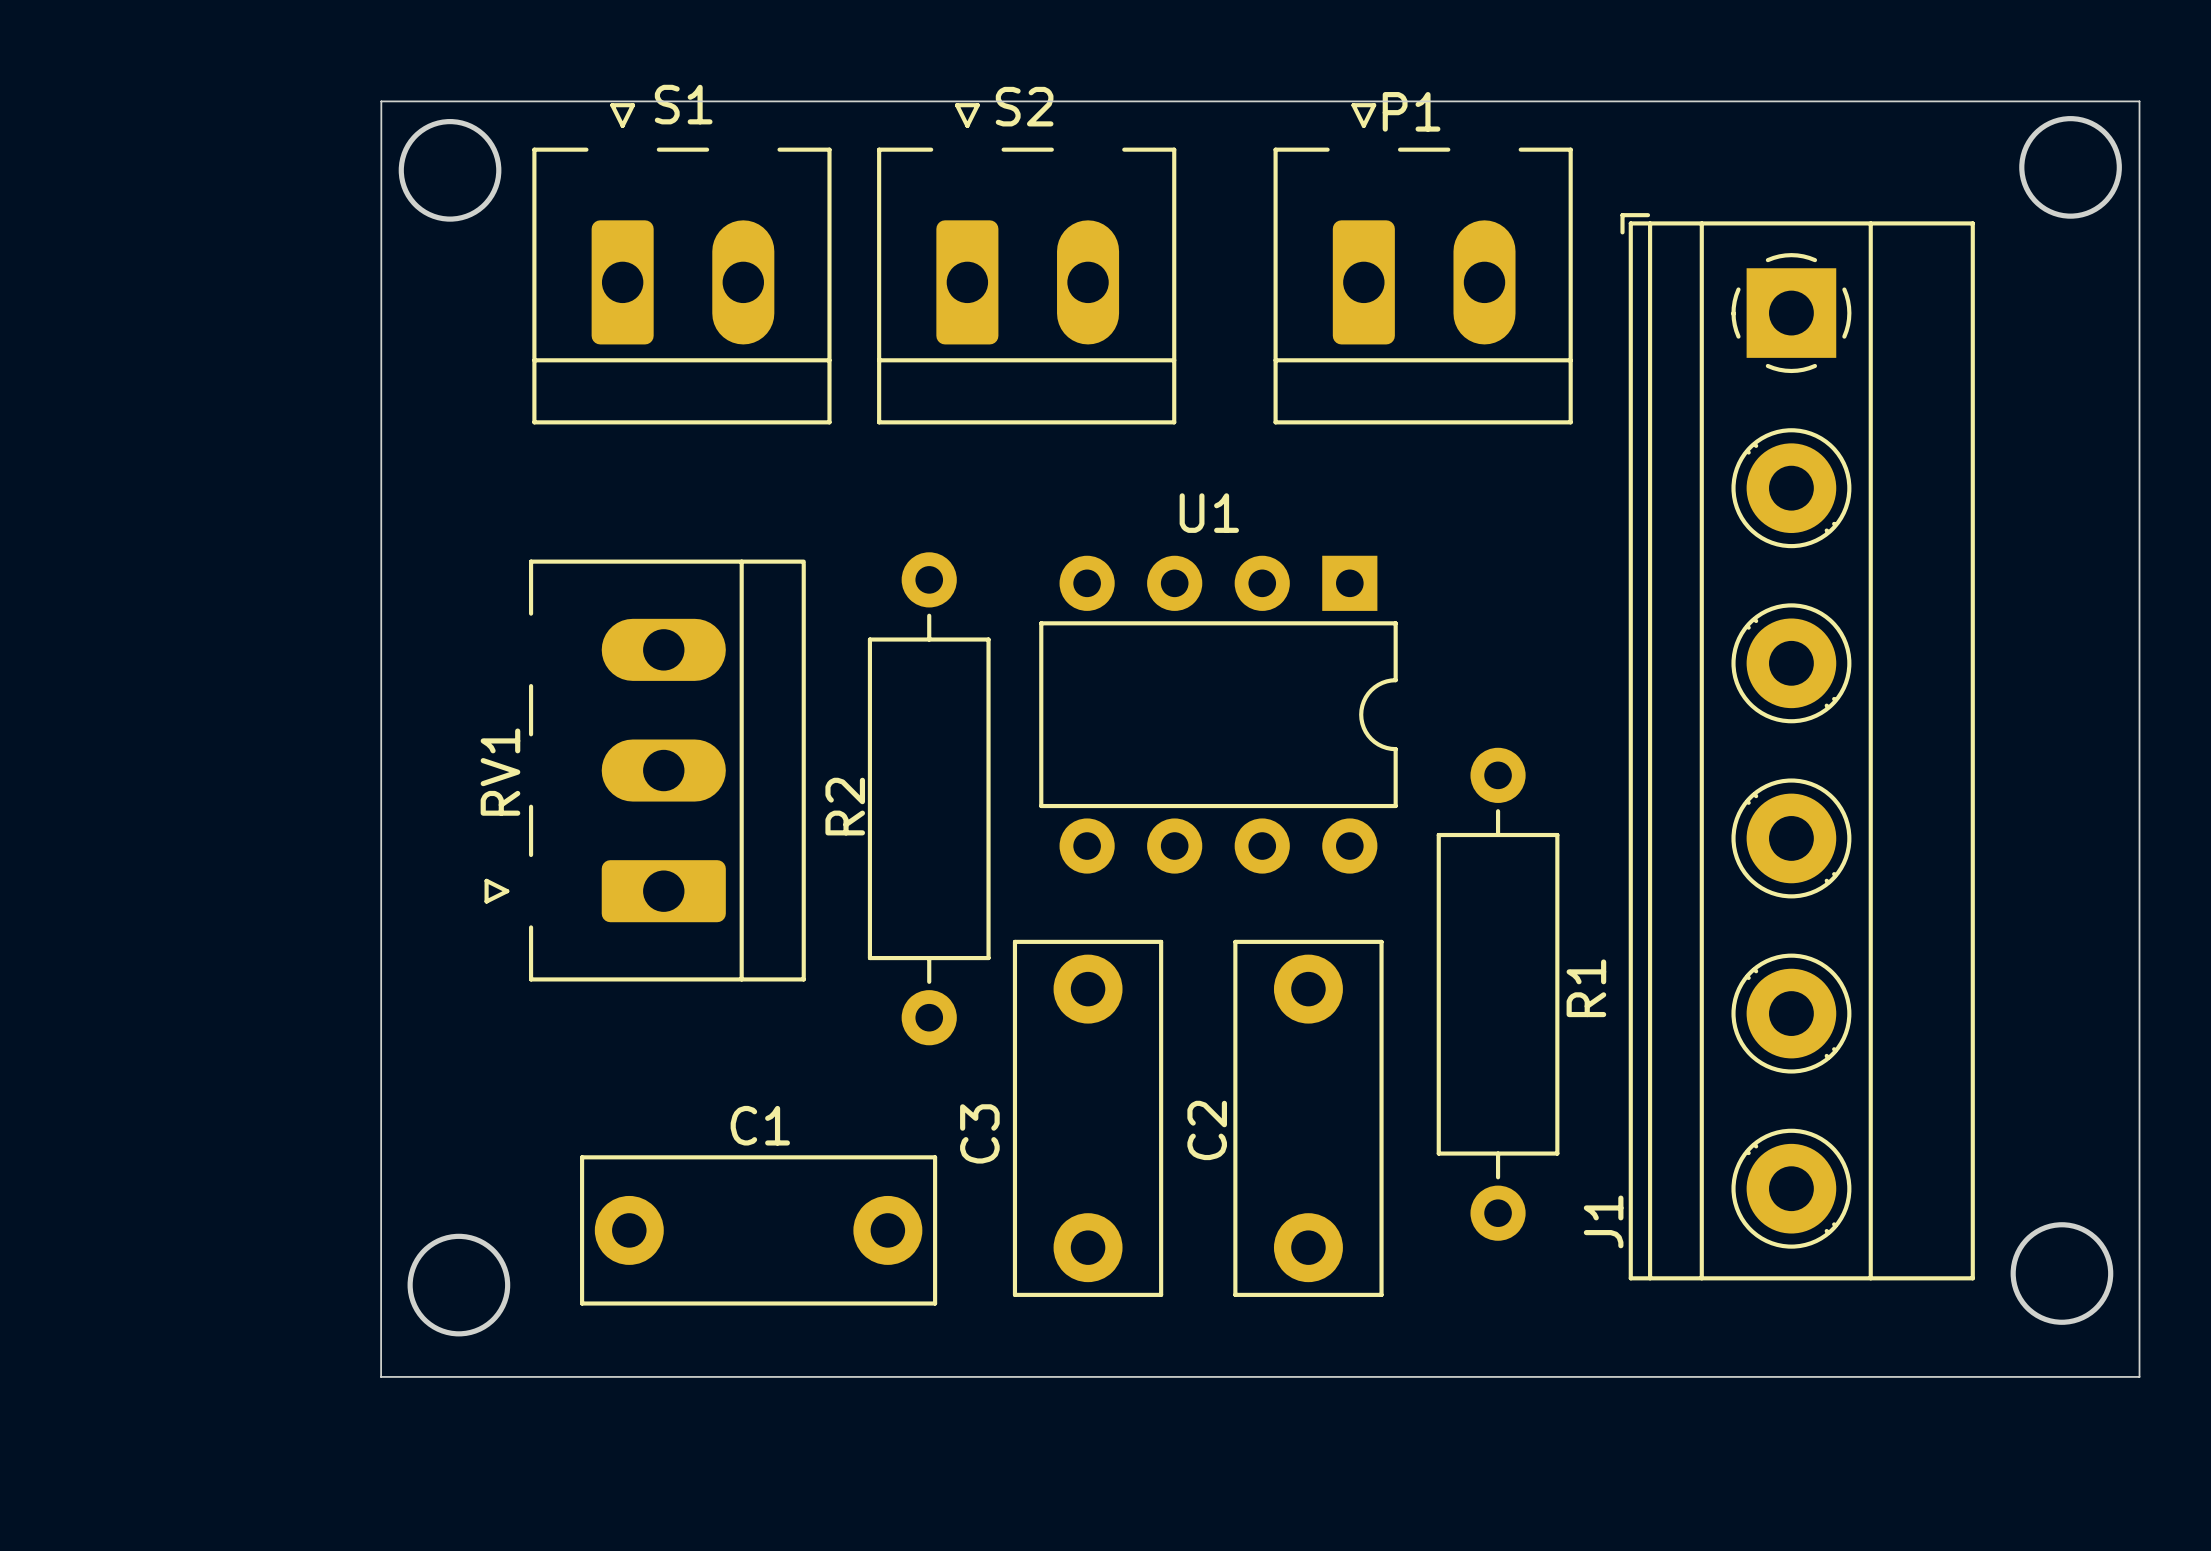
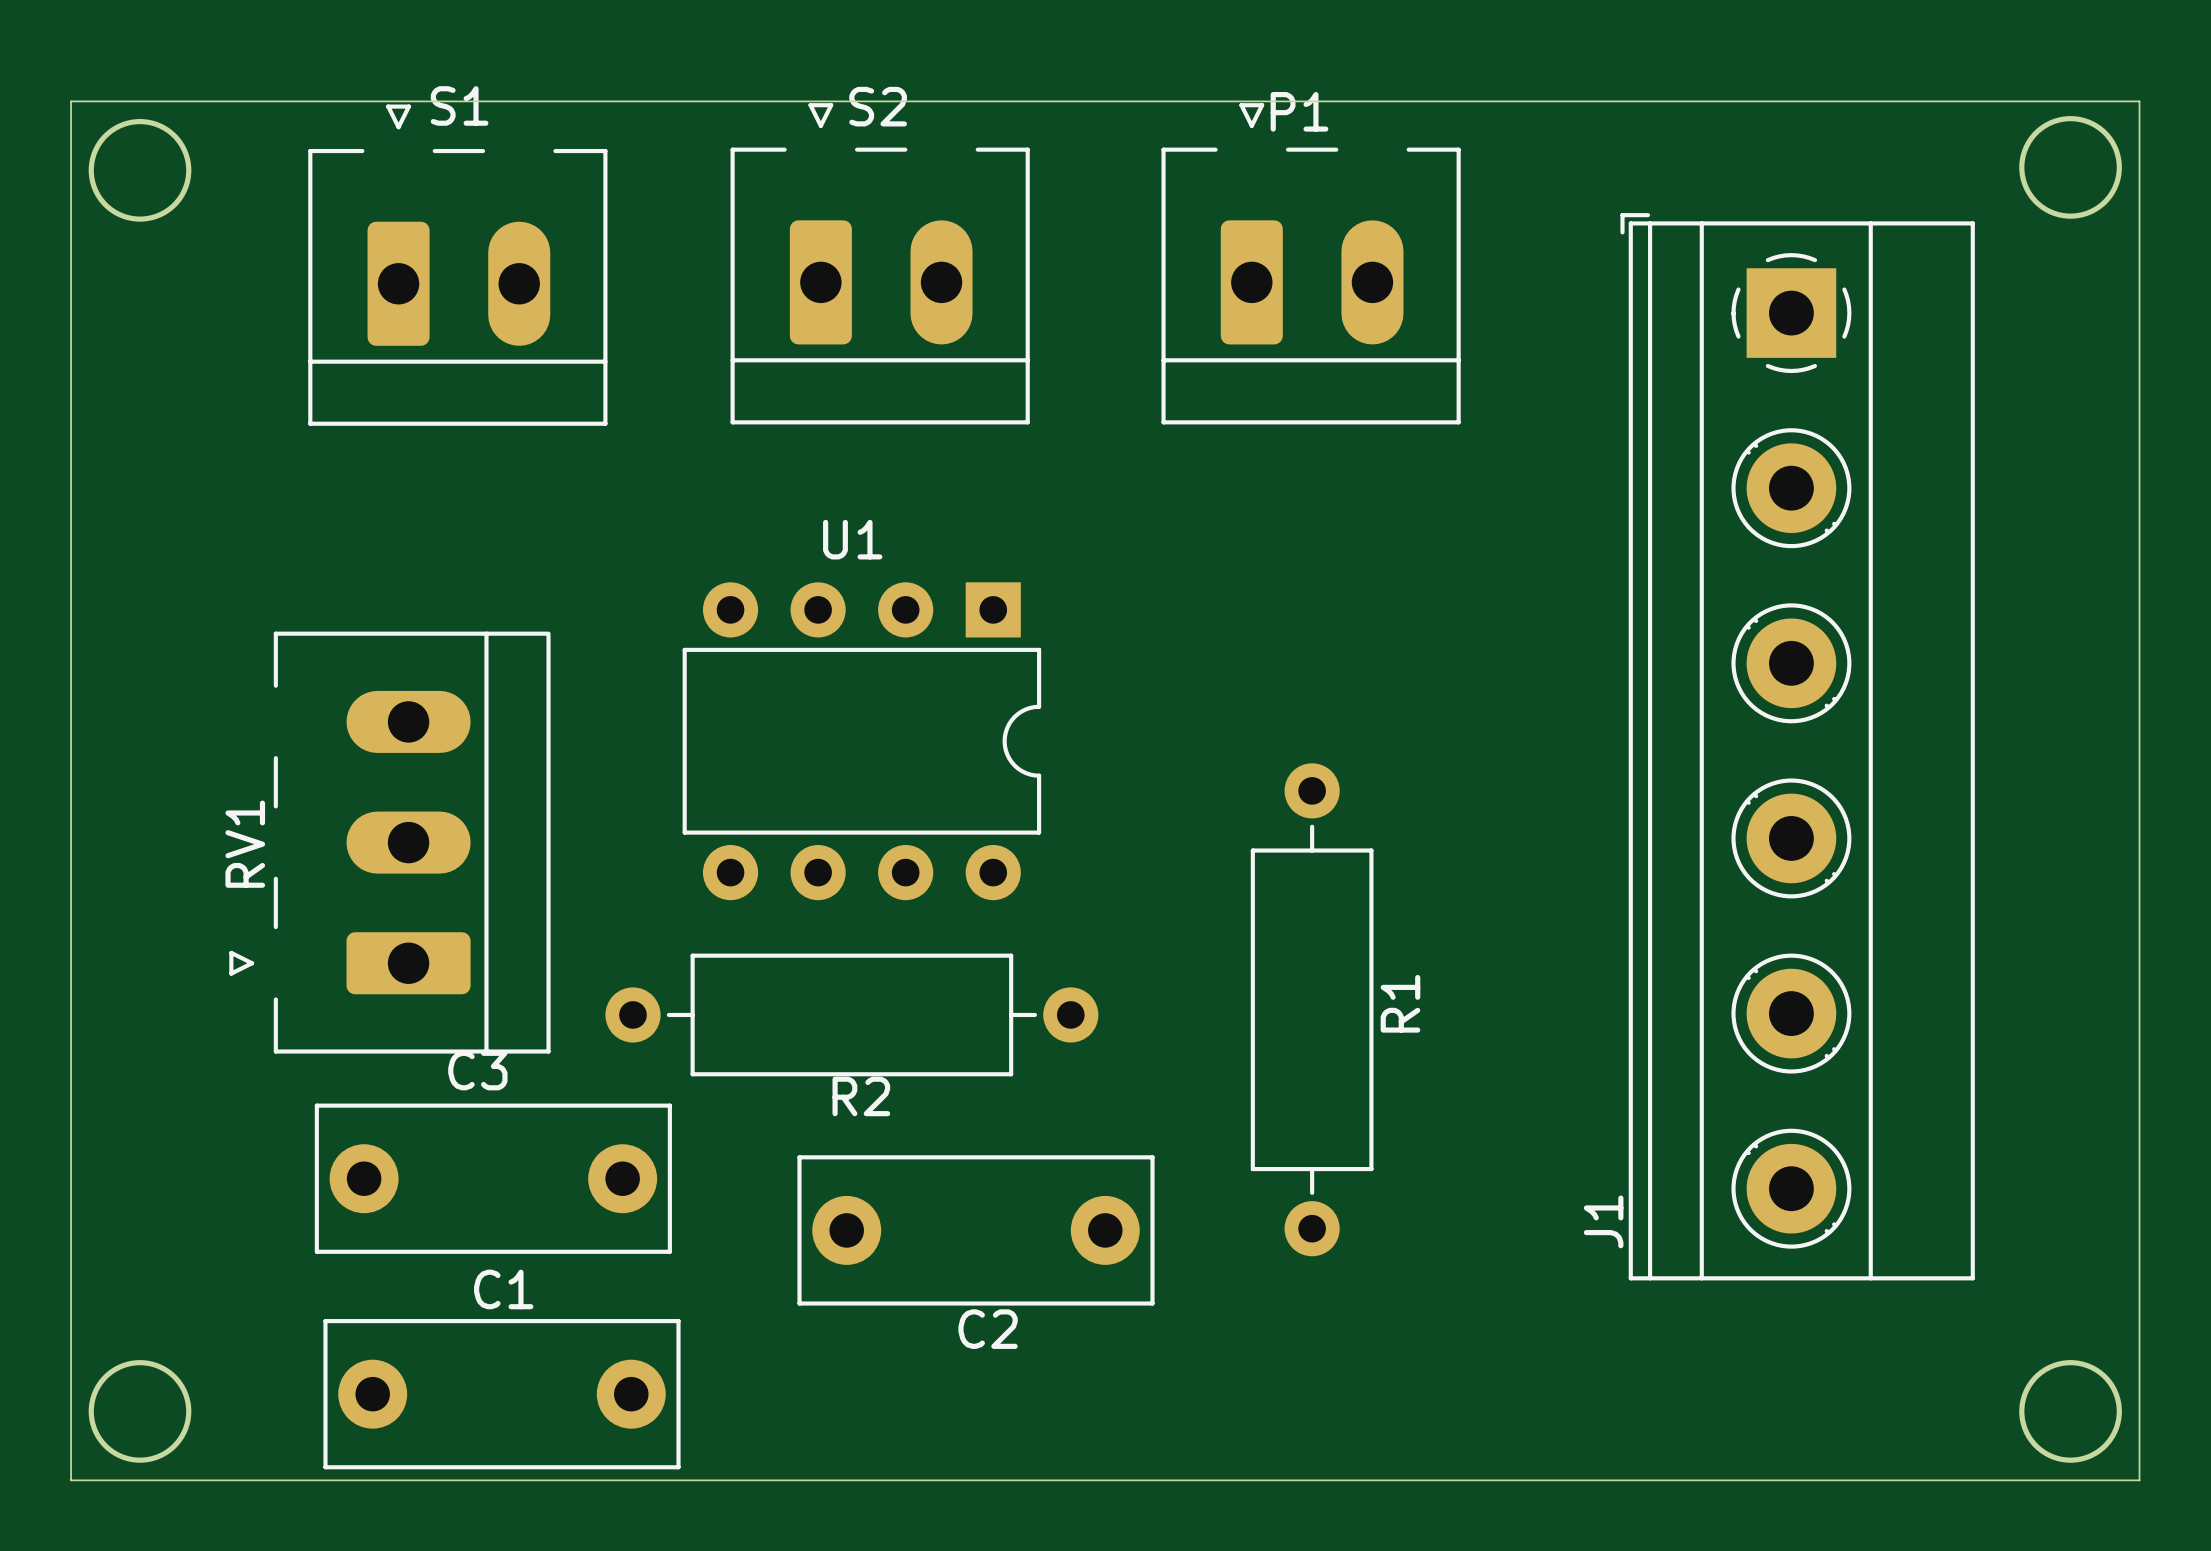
board edge: (381, 101) (381, 1376) (2139, 1376) -> (381, 101) (71, 101) (71, 1480) (2139, 1480) (2139, 1376)
round board edge position: (450, 170) -> (140, 170)
S1 position: (681, 263) -> (457, 265)
S2 position: (1026, 263) -> (880, 263)
P1 position: (1423, 263) -> (1311, 263)
U1 position: (1218, 714) -> (861, 741)
RV1 position: (645, 770) -> (389, 842)
R2 rotation: 0° (929, 798) -> 90° clockwise (851, 1014)
R2 name position: R2 (845, 806) -> R2 (861, 1096)
R1 position: (1498, 994) -> (1312, 1009)
C3 rotation: 0° (1088, 1118) -> 90° clockwise (493, 1178)
C3 position: (1088, 1118) -> (493, 1178)
C2 rotation: 0° (1308, 1118) -> 90° clockwise (976, 1230)
C2 position: (1308, 1118) -> (976, 1230)
C2 name position: C2 (1207, 1130) -> C2 (988, 1329)
C1 position: (758, 1230) -> (501, 1394)
round board edge position: (2061, 1273) -> (2070, 1411)
round board edge position: (458, 1285) -> (140, 1411)

